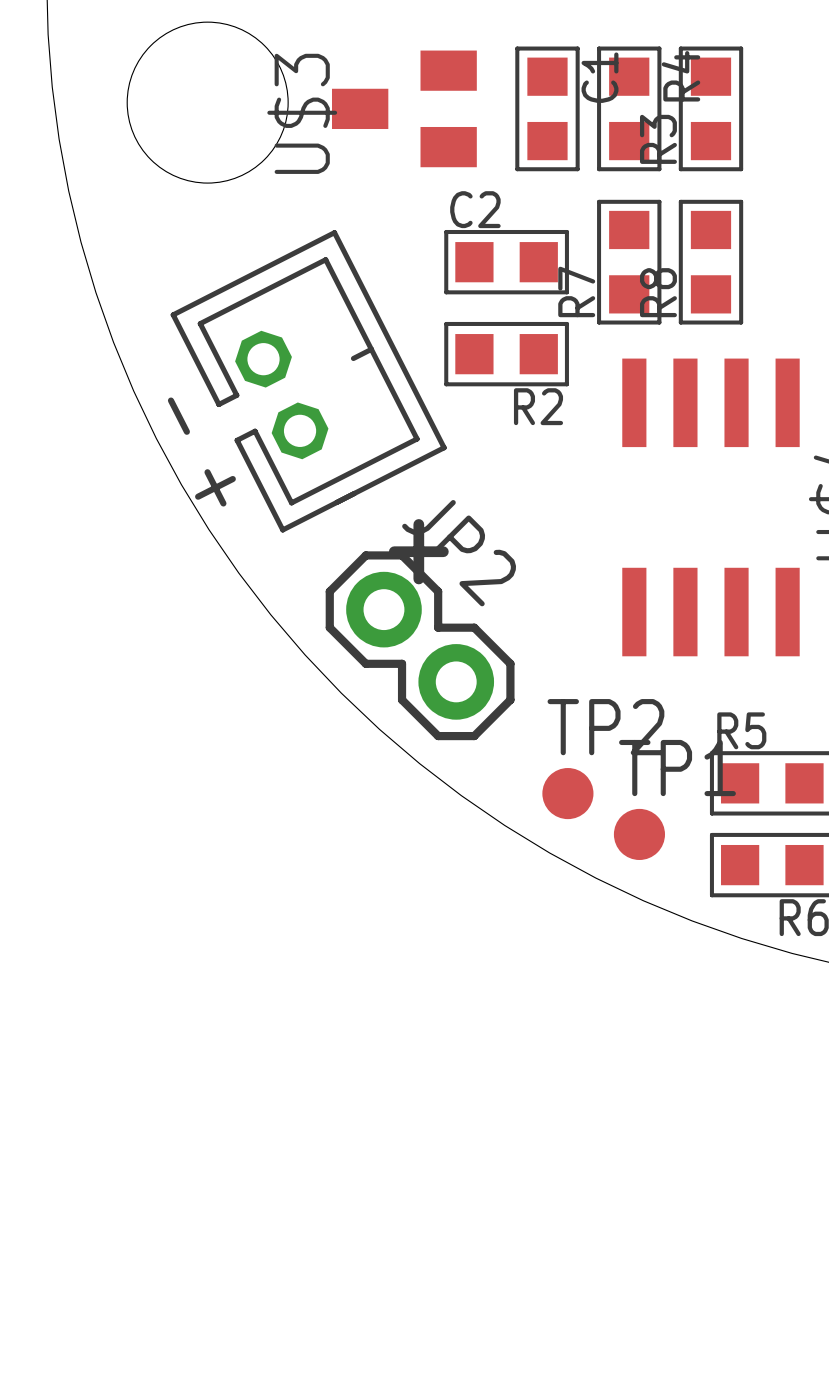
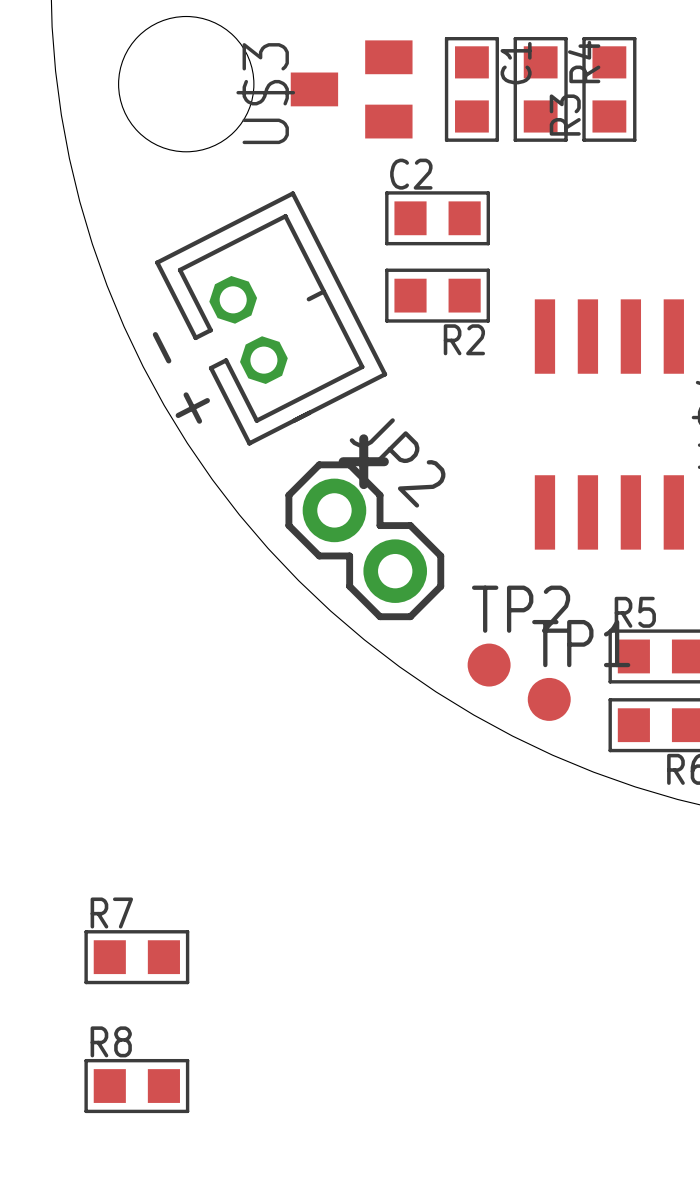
R7 rotation: 0° (629, 262) -> 90° clockwise (136, 957)
R7 position: (629, 262) -> (136, 957)
R8 rotation: 0° (710, 262) -> 90° clockwise (136, 1086)
R8 position: (710, 262) -> (136, 1086)

